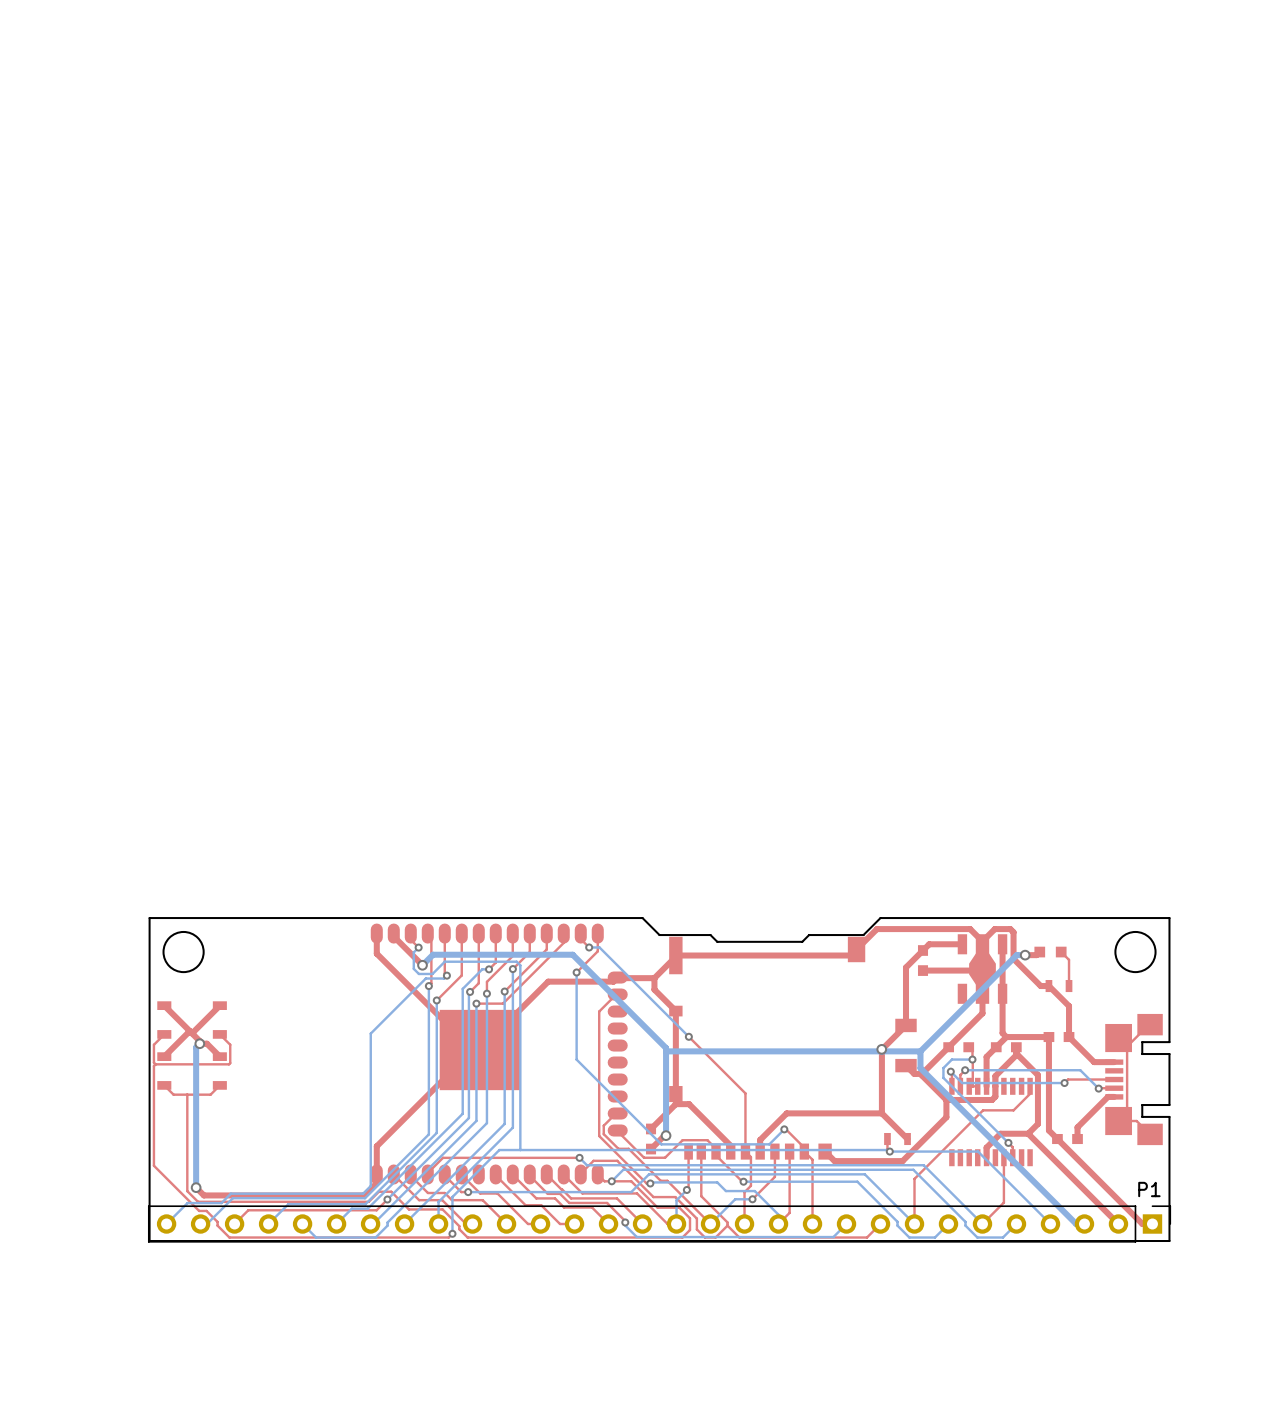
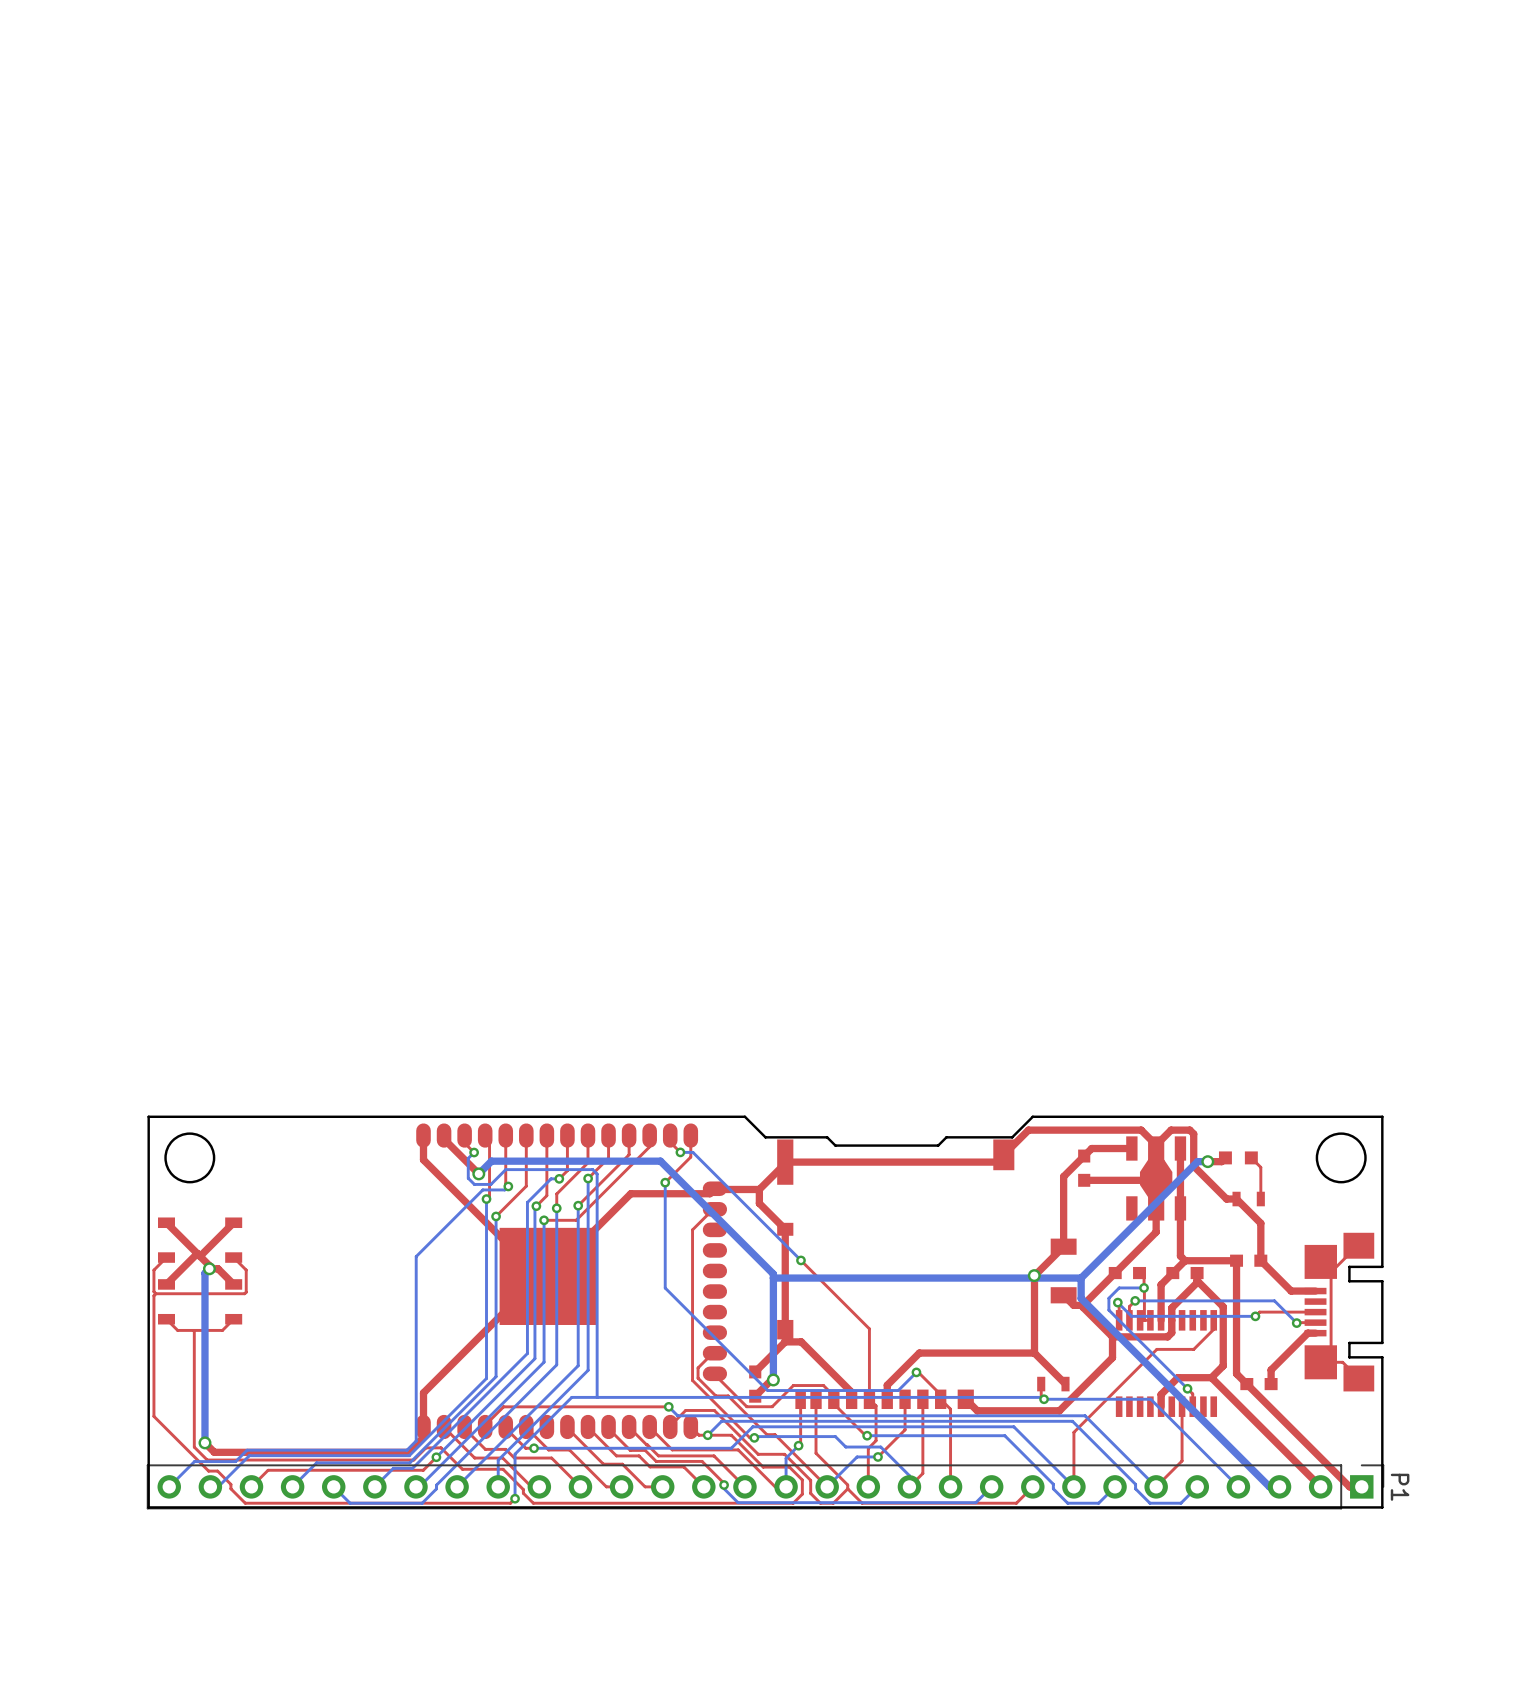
P1 name rotation: 0° (1149, 1189) -> 90° clockwise (1400, 1487)
P1 name position: P1 (1149, 1189) -> P1 (1400, 1487)

